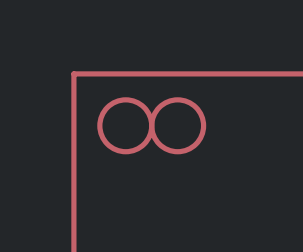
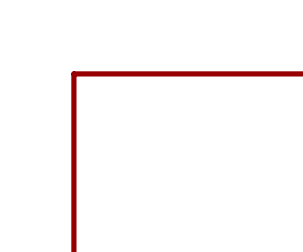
part: (125, 125) -> none
part: (177, 125) -> none

